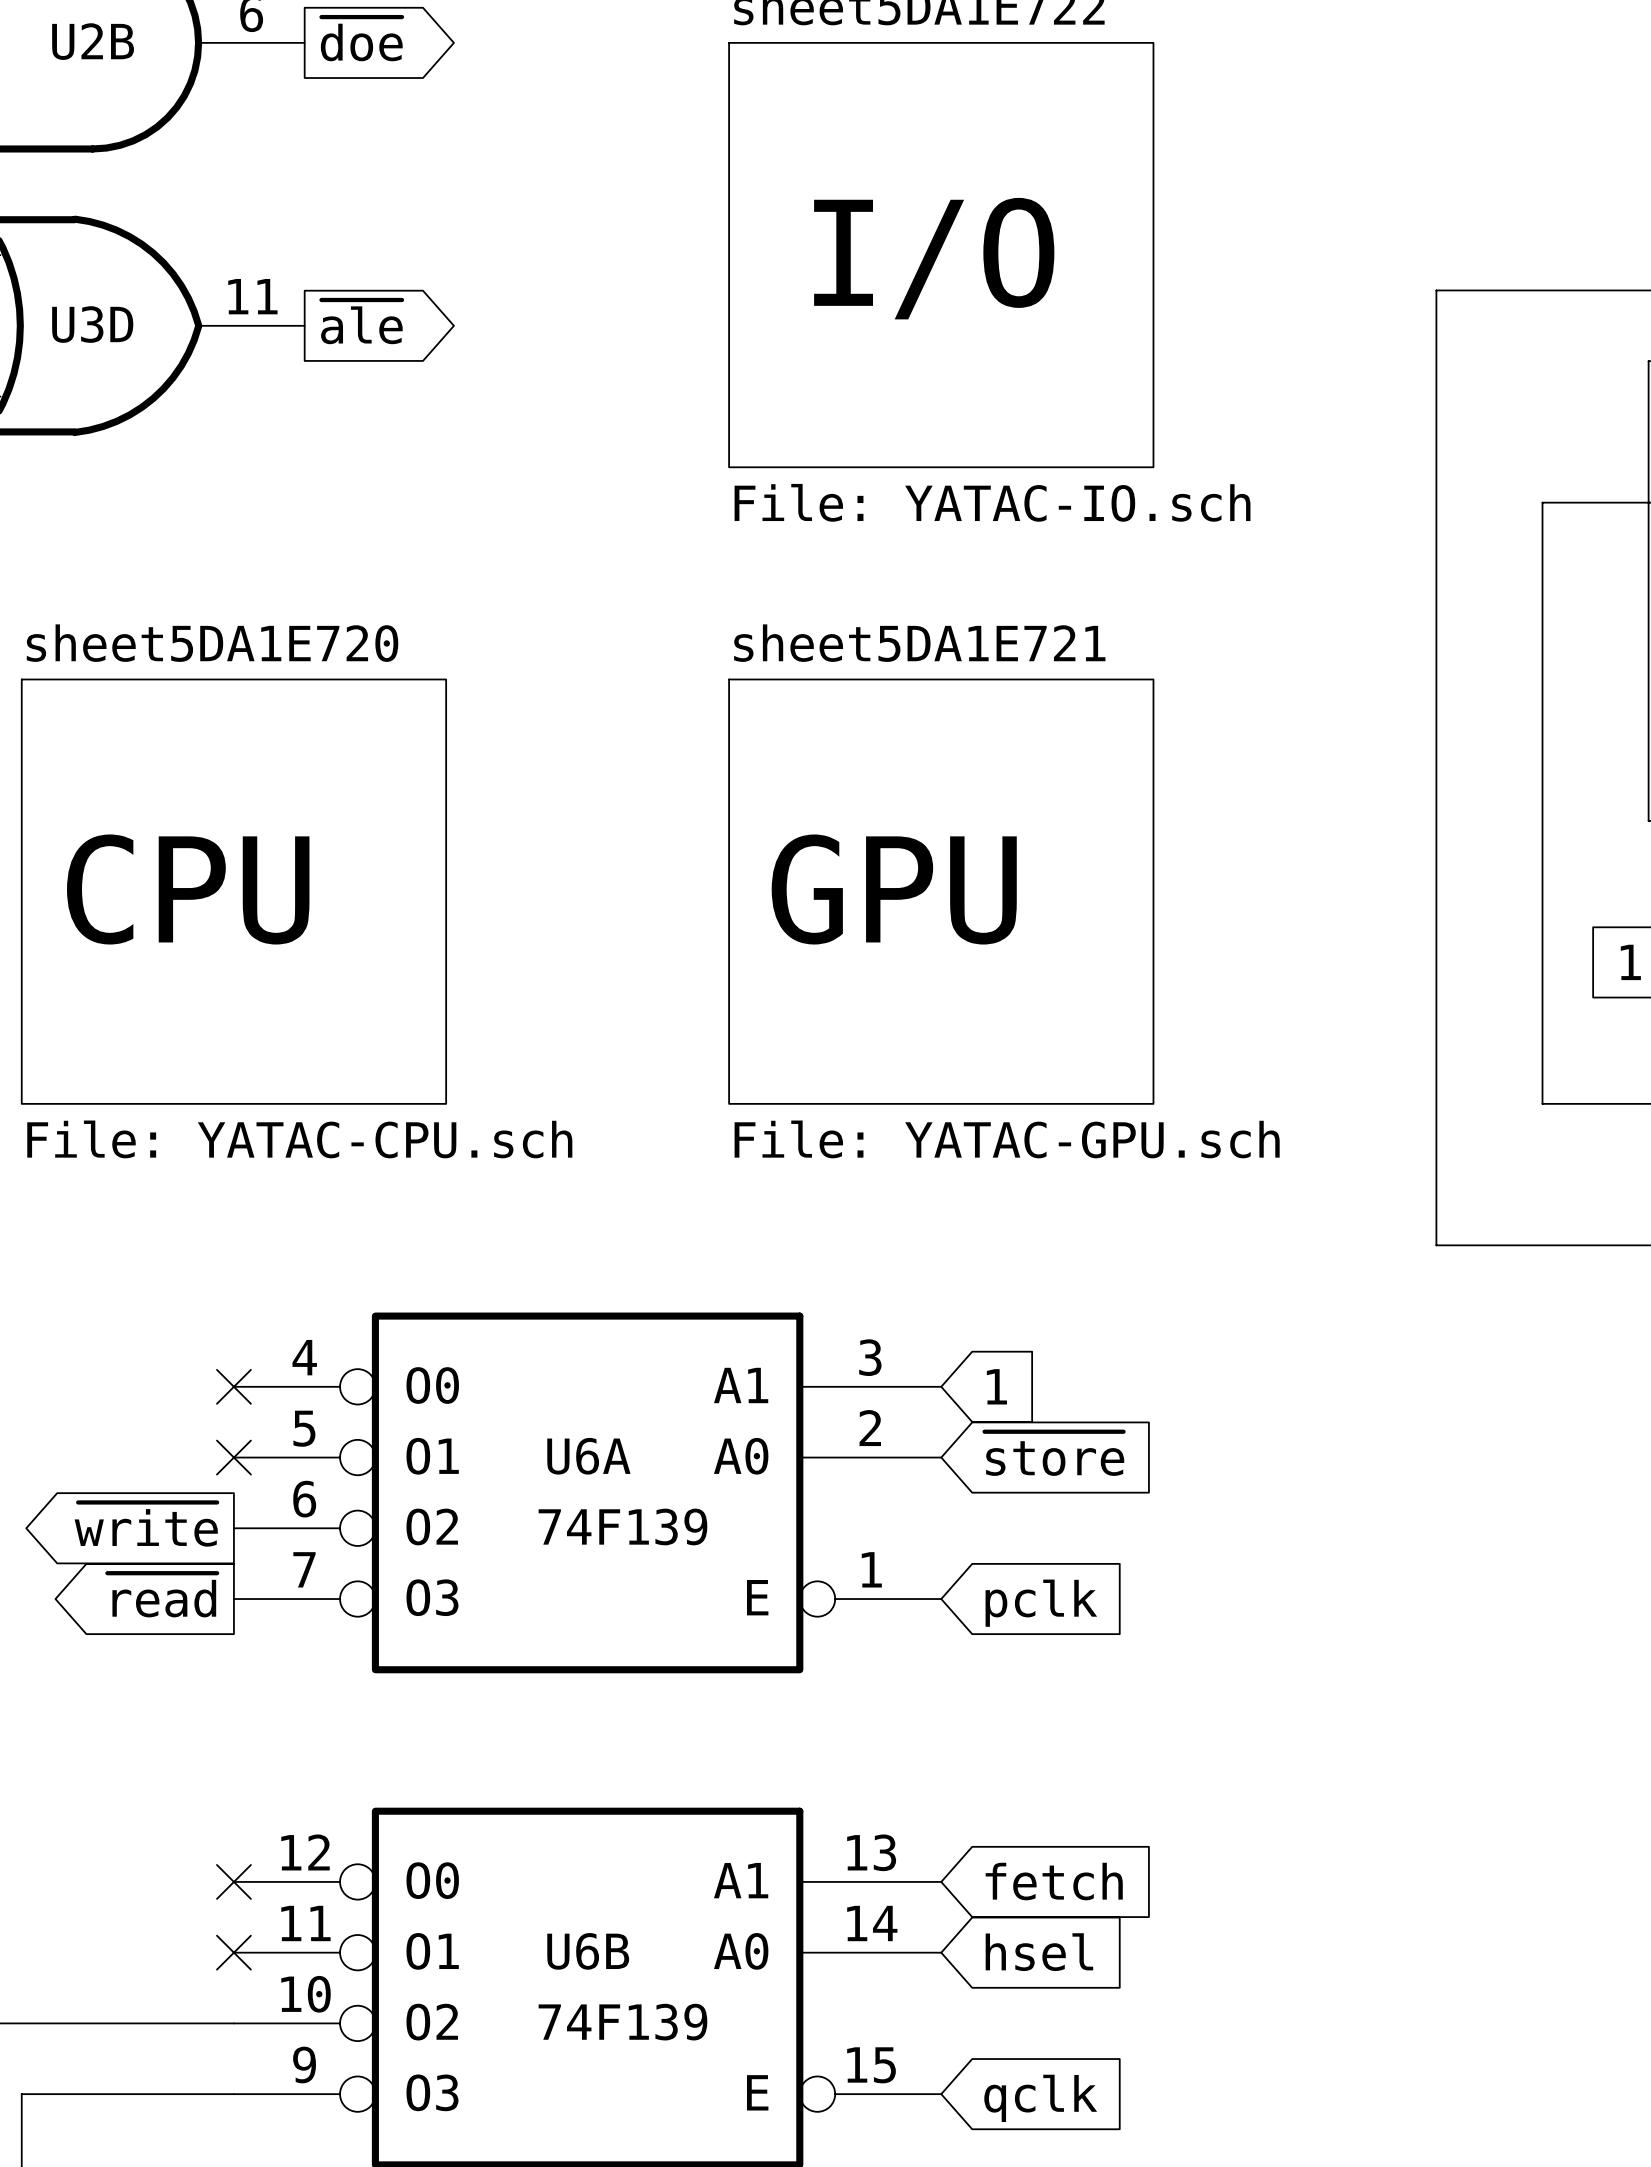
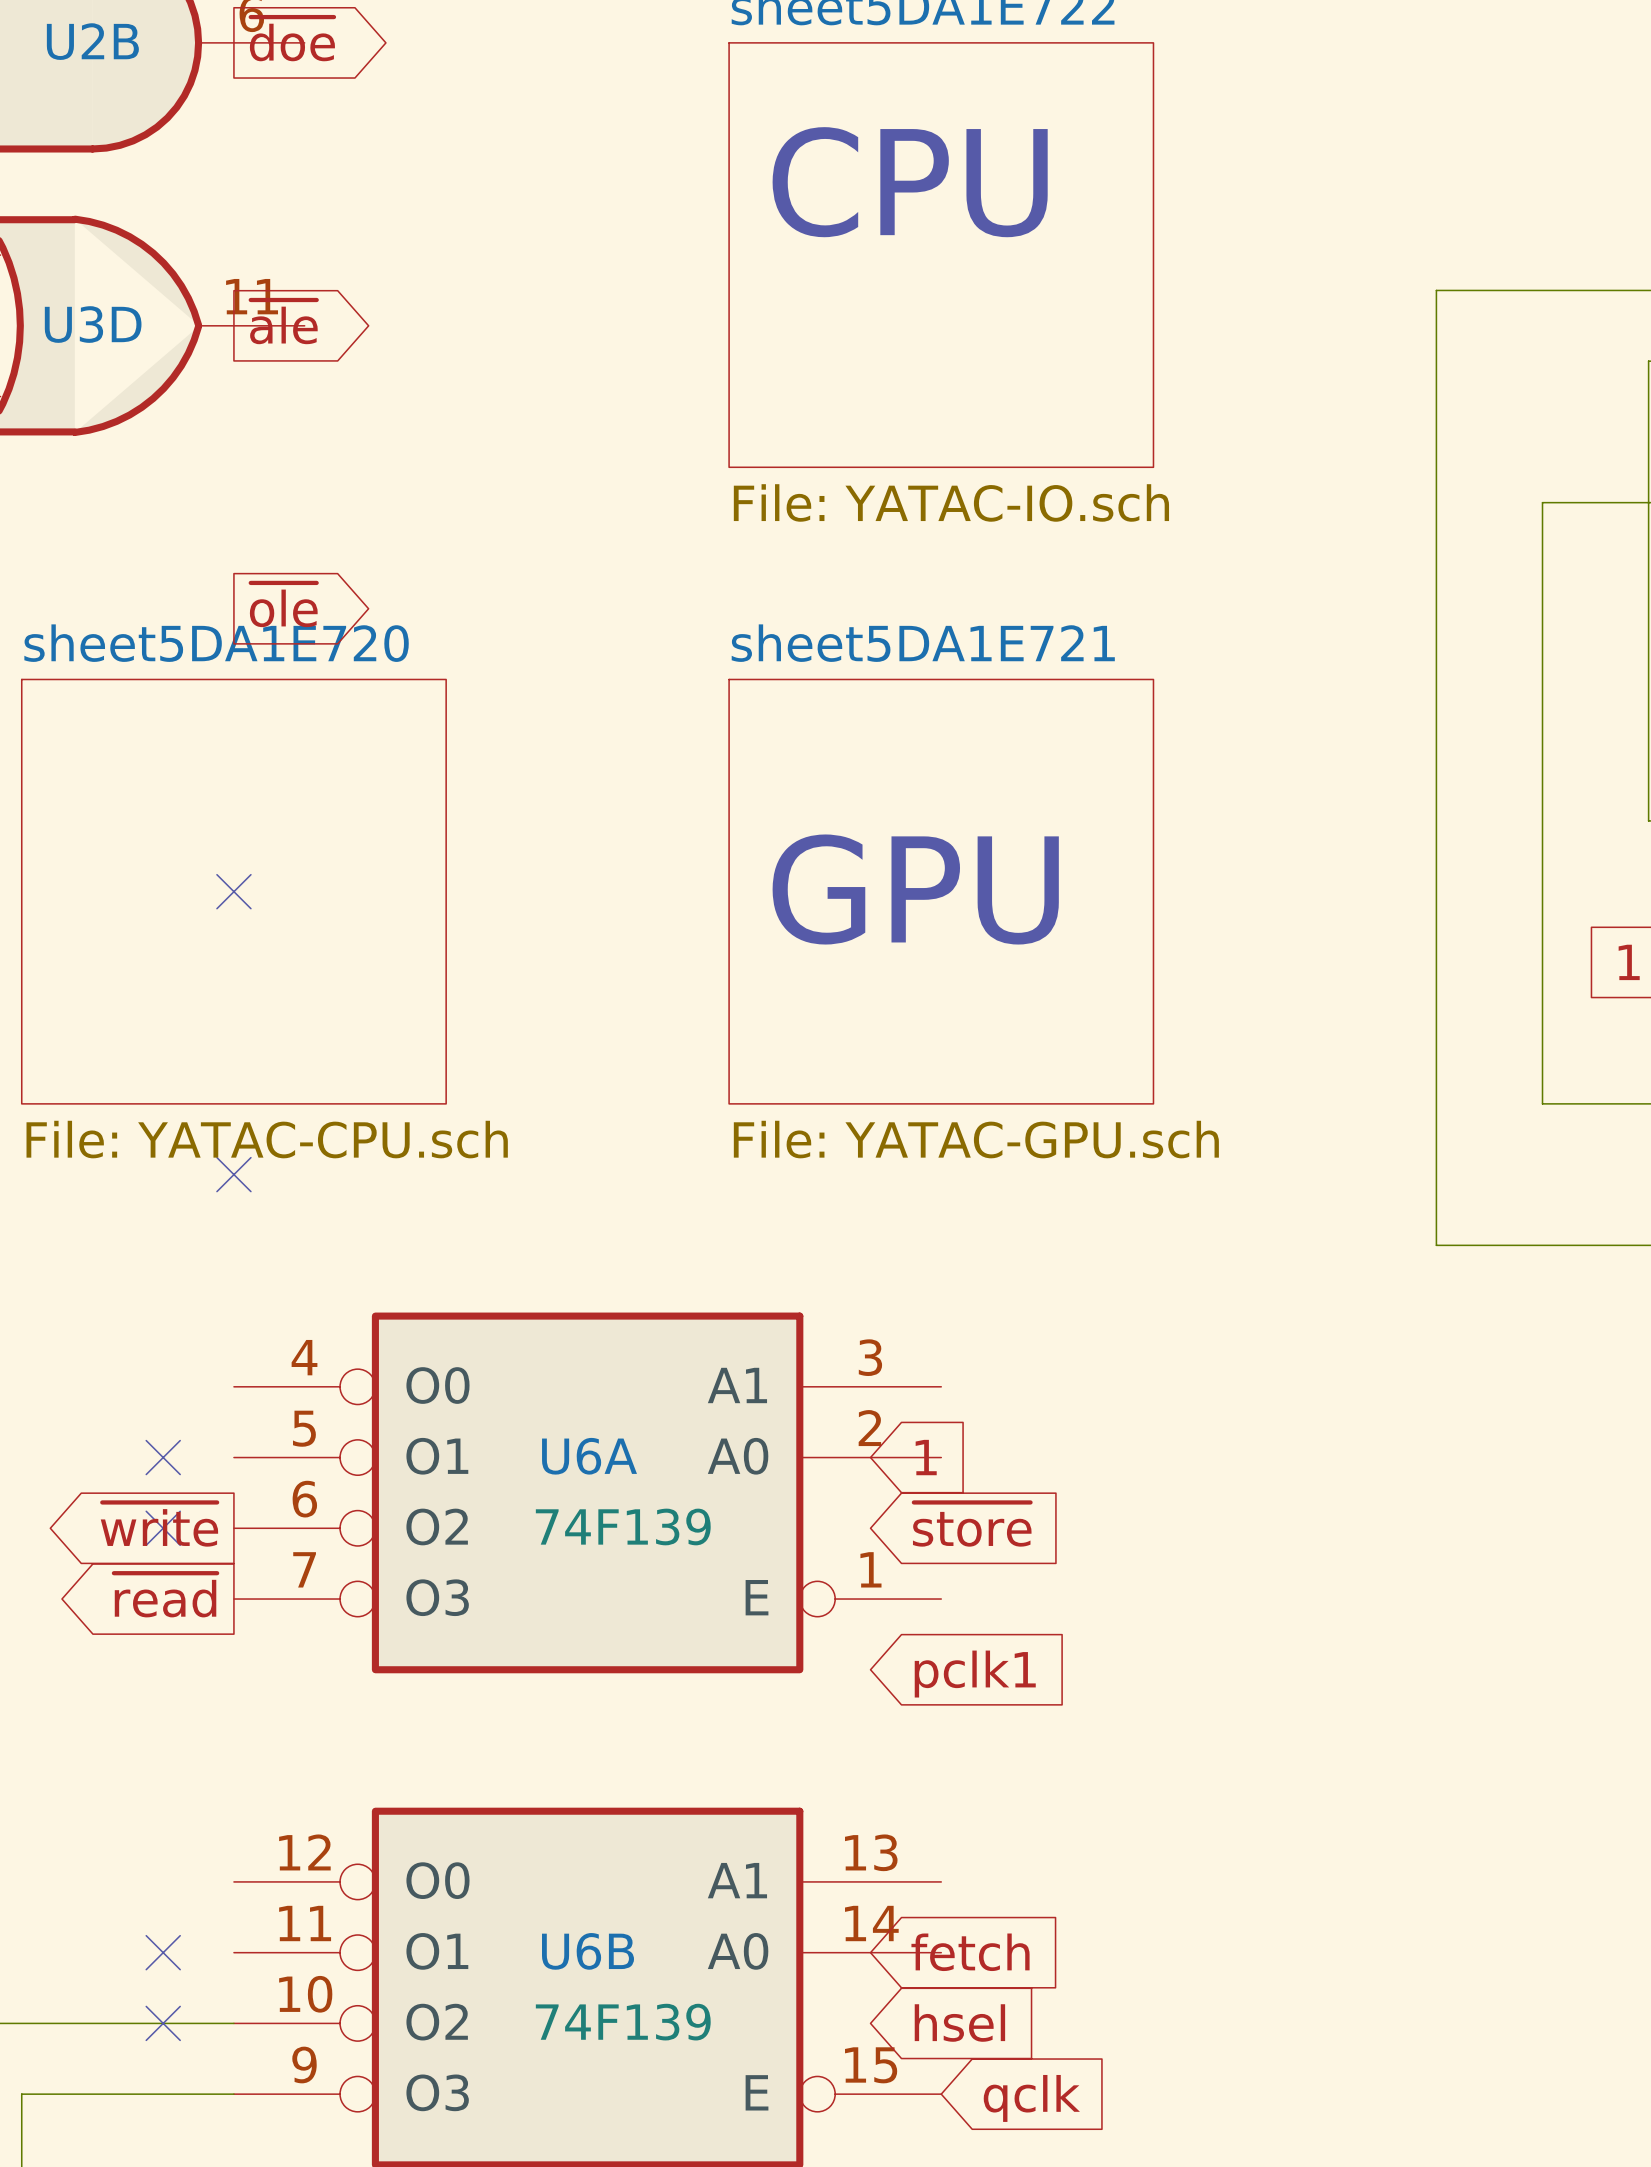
global label position: ~{doe} (361, 39) -> ~{doe} (292, 39)
text: none -> CPU (910, 182)
text: I/O (934, 258) -> none
global label position: ~{ale} (361, 322) -> ~{ale} (283, 322)
global label: none -> ~{ole} (283, 605)
text: CPU (188, 889) -> none
no-connect mark: none -> (233, 891)
no-connect mark: none -> (233, 1174)
no-connect mark: (233, 1386) -> none
global label position: 1 (996, 1386) -> 1 (926, 1457)
global label position: ~{store} (1054, 1453) -> ~{store} (972, 1524)
no-connect mark: none -> (163, 1457)
no-connect mark: (233, 1457) -> none
no-connect mark: none -> (163, 1528)
global label: pclk (1041, 1603) -> pclk1 (975, 1674)
no-connect mark: (233, 1881) -> none
global label position: fetch (1054, 1881) -> fetch (970, 1952)
no-connect mark: none -> (163, 1952)
no-connect mark: (233, 1952) -> none
global label position: hsel (1039, 1952) -> hsel (959, 2023)
no-connect mark: none -> (163, 2023)

